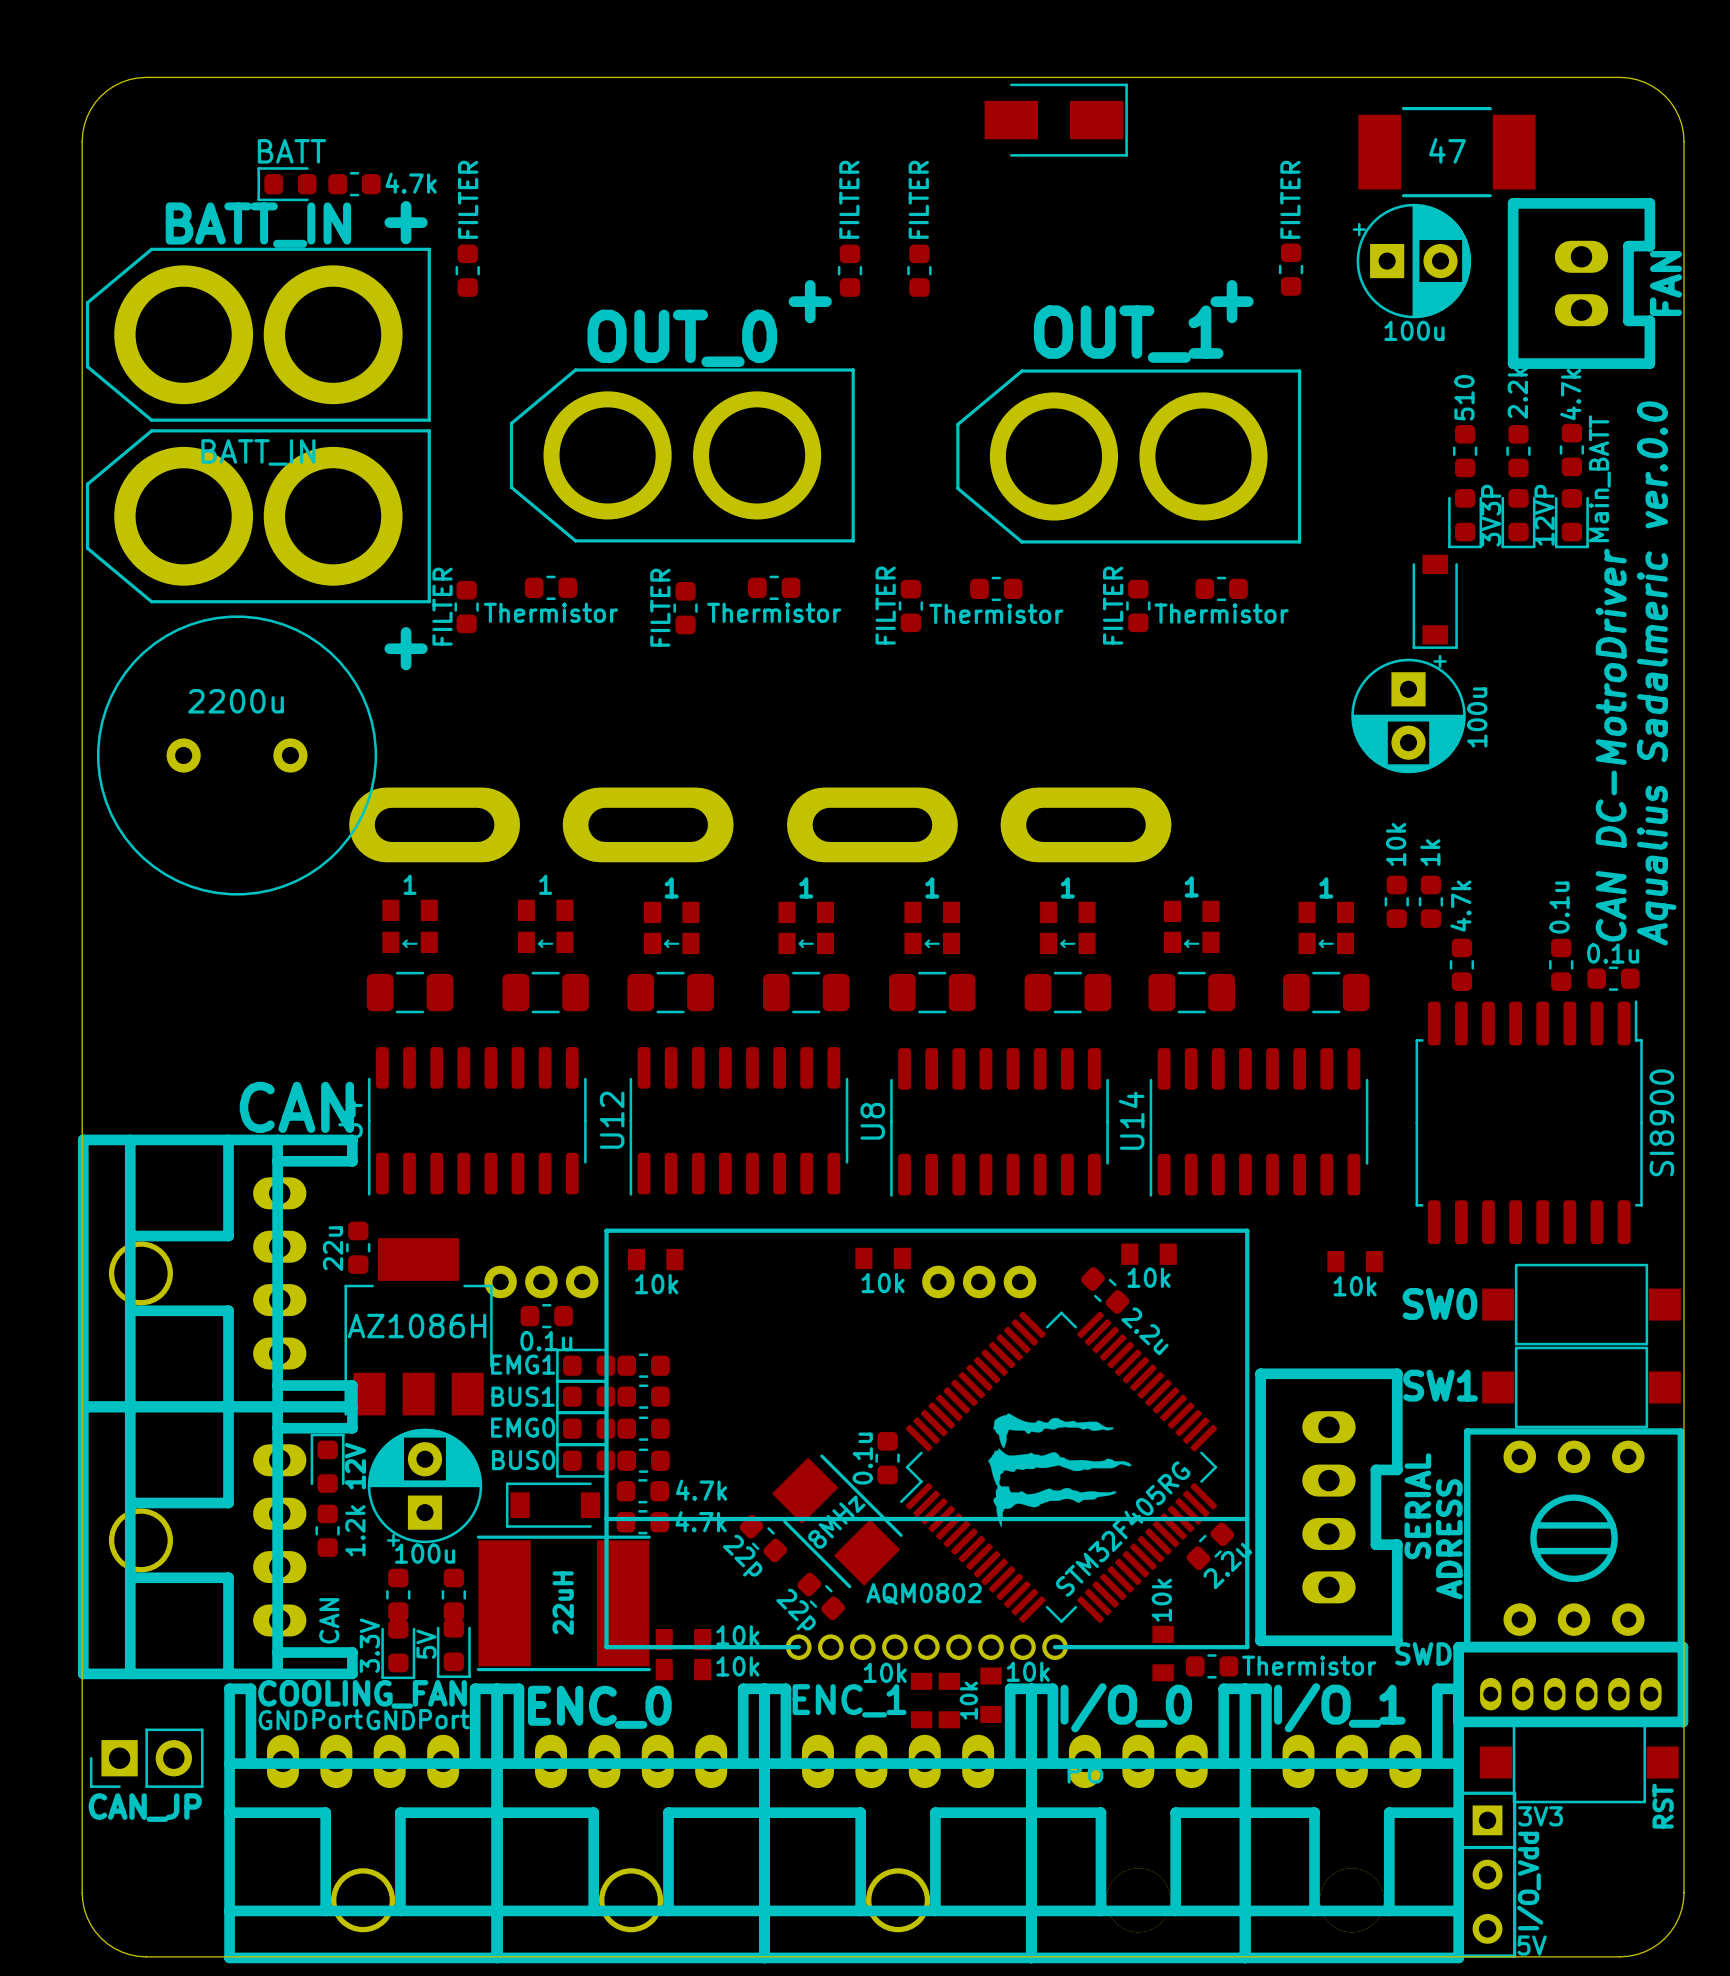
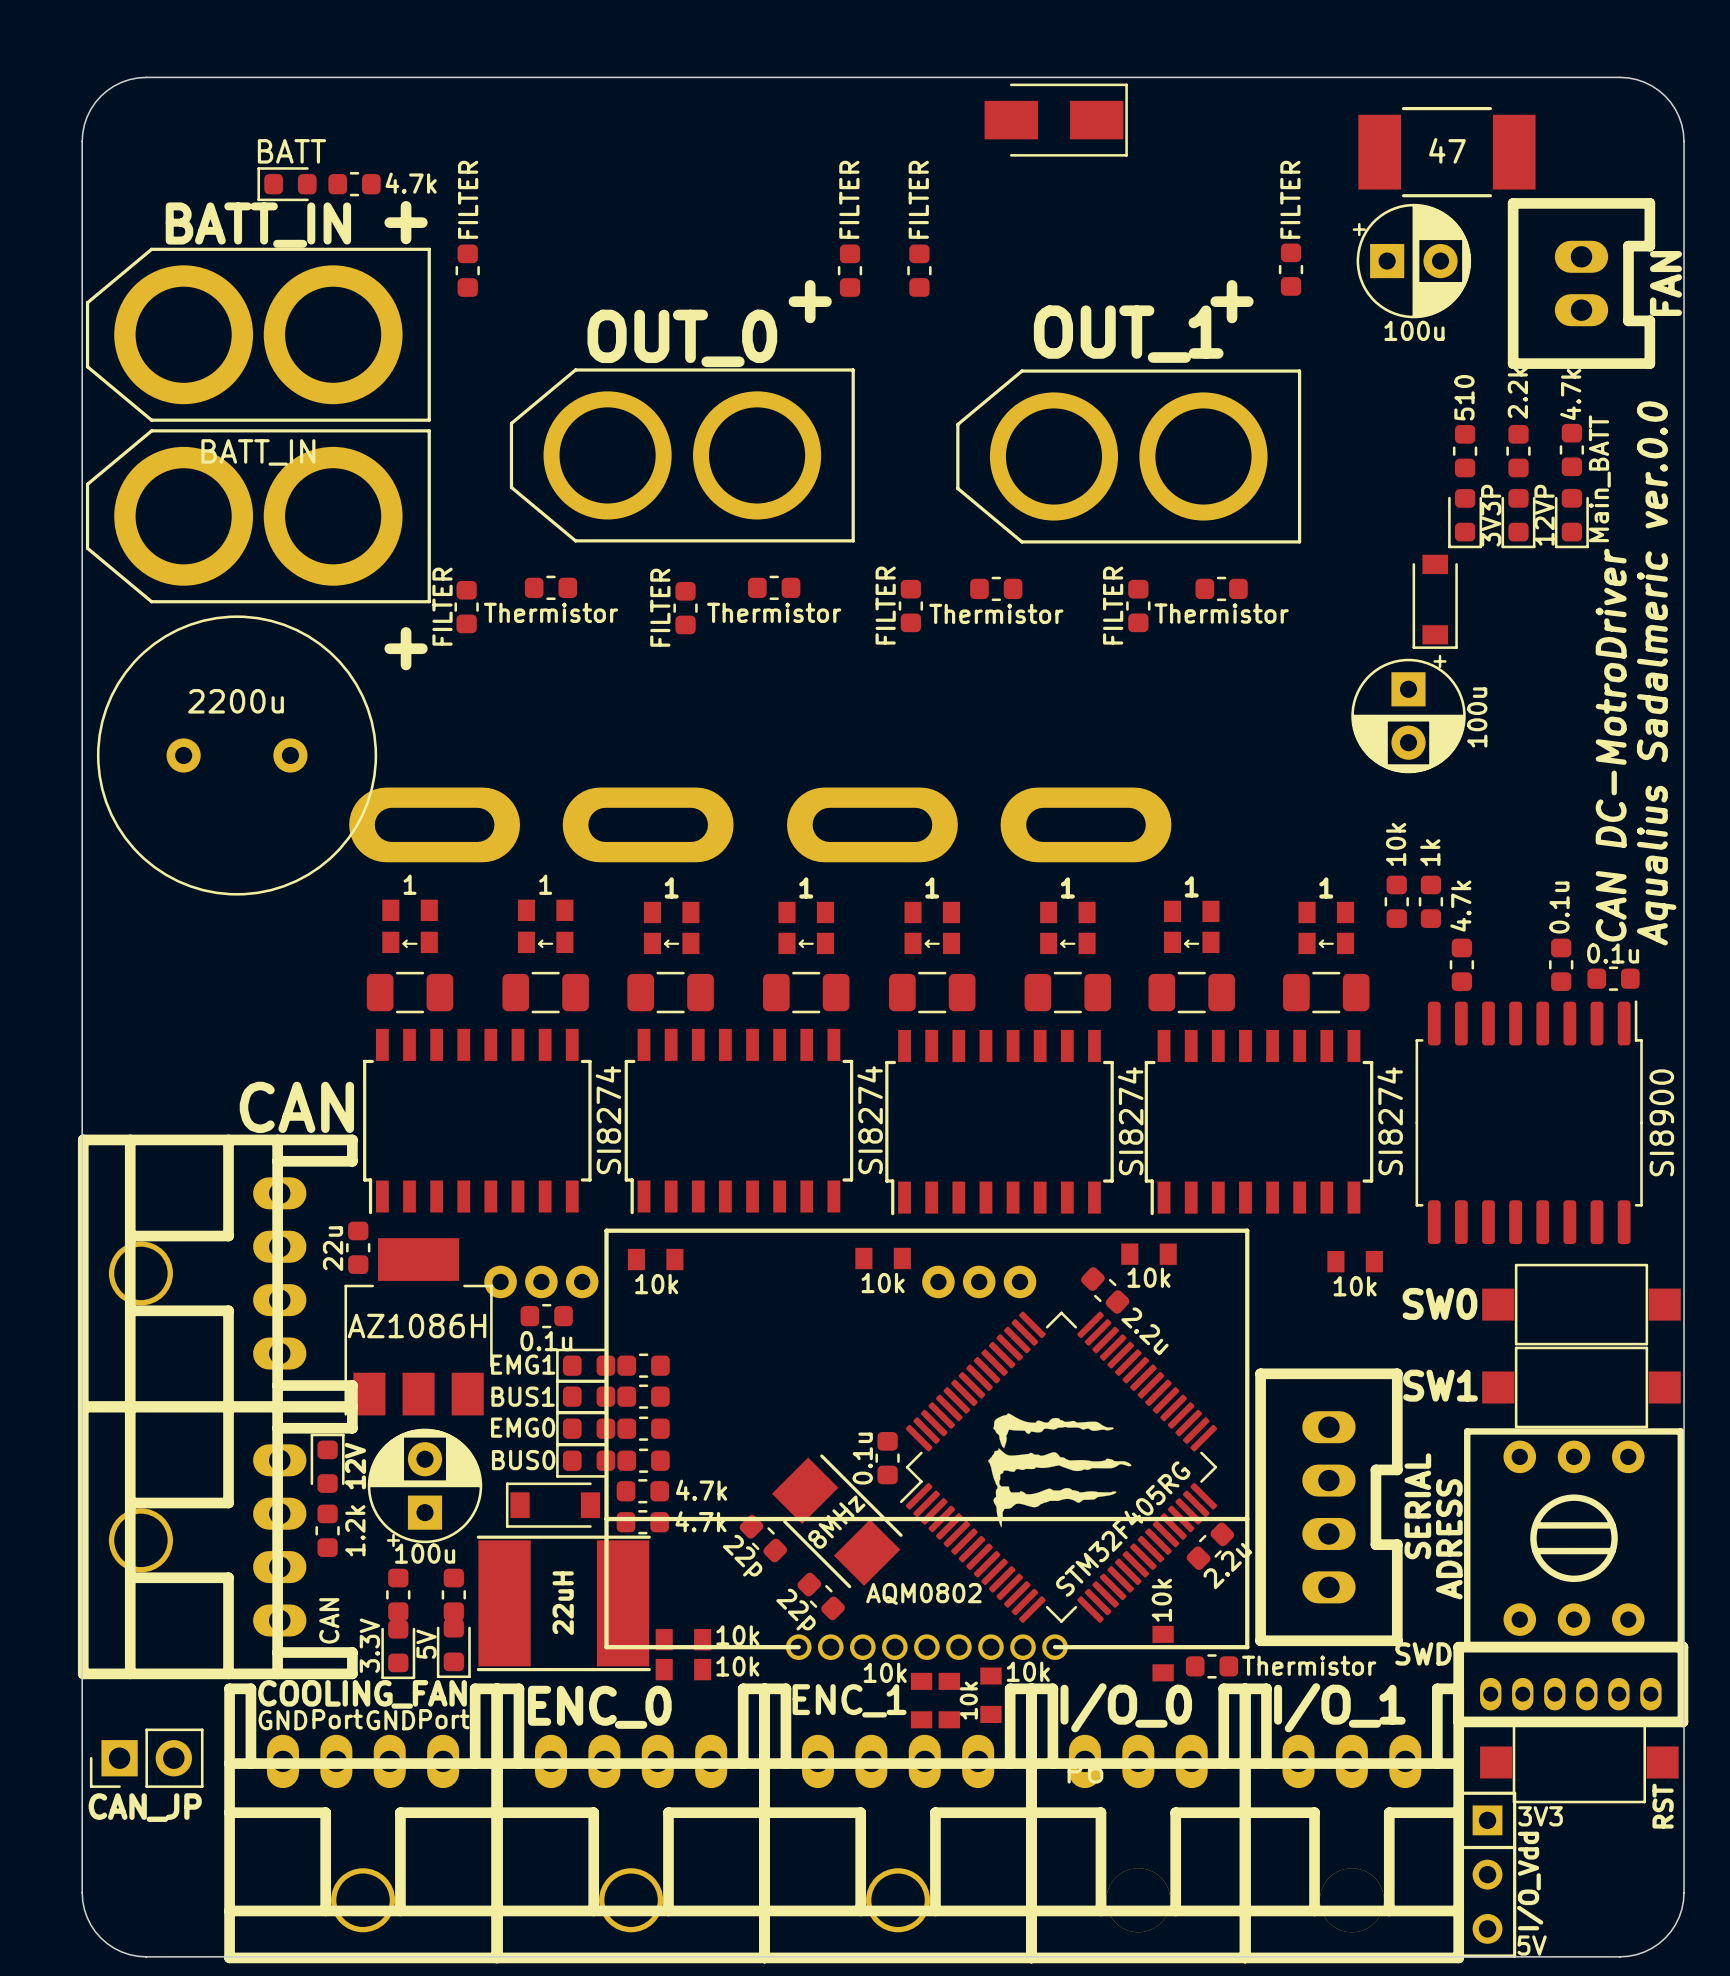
part: (477, 1121) -> none
part: none -> SI8274 (477, 1121)
U12: (738, 1121) -> none
part: none -> SI8274 (738, 1121)
U8: (999, 1122) -> none
part: none -> SI8274 (999, 1122)
U14: (1259, 1122) -> none
part: none -> SI8274 (1259, 1122)

